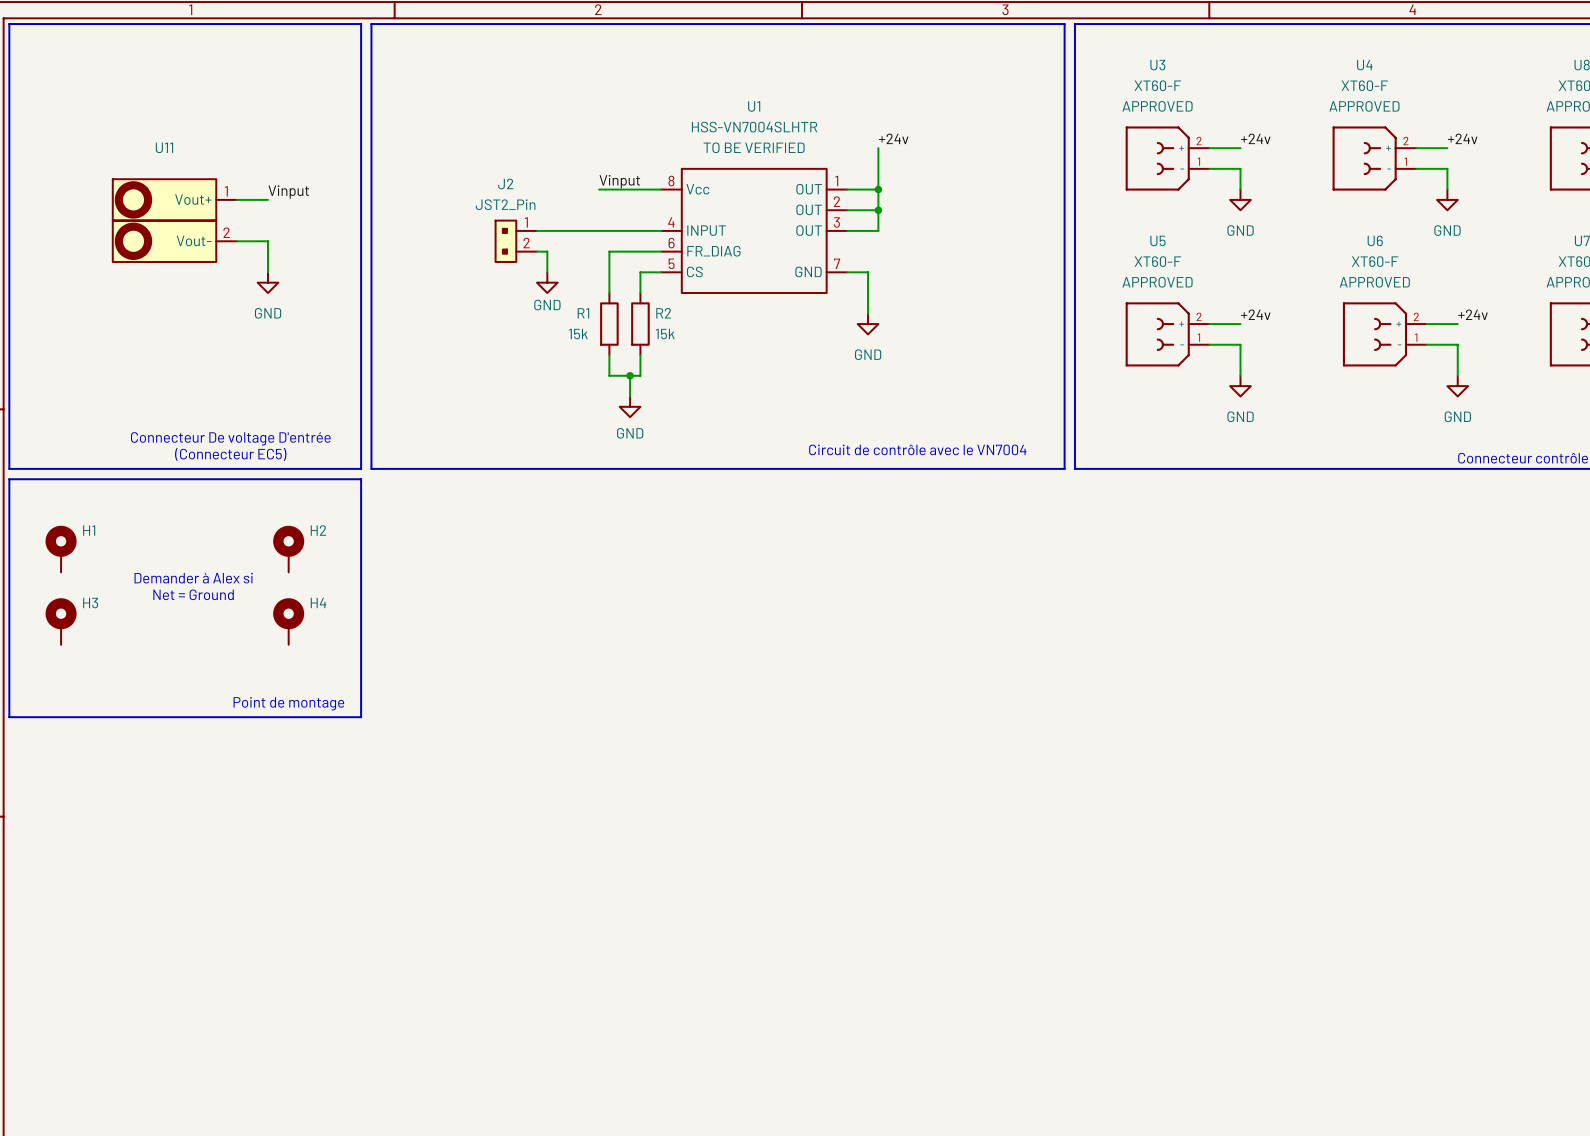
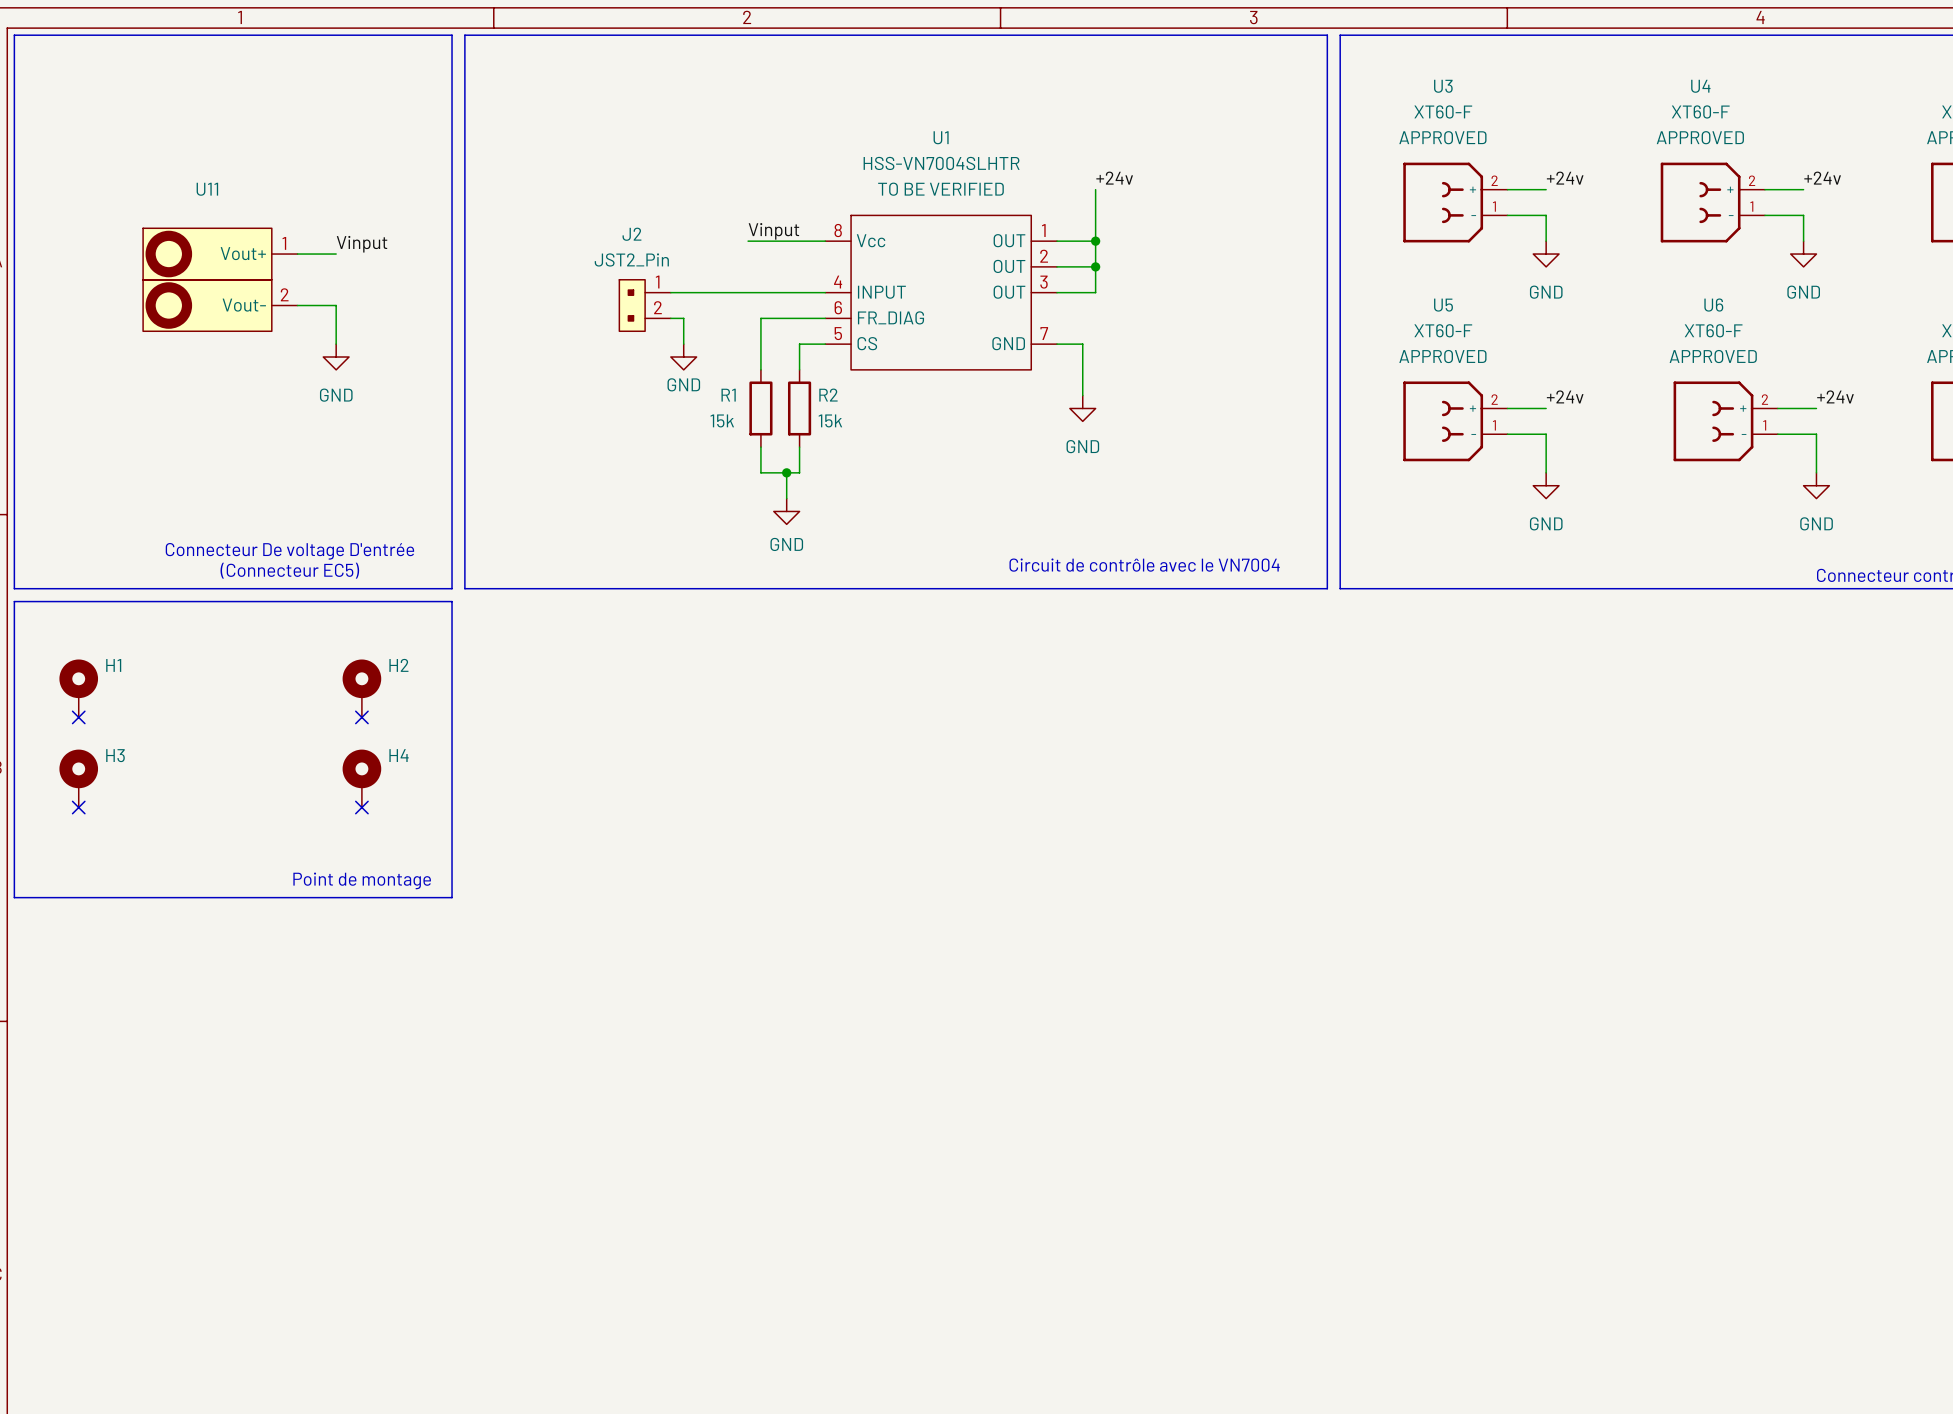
no-connect mark: none -> (78, 717)
no-connect mark: none -> (361, 717)
text: Demander à Alex si (193, 578) -> none
text: Net = Ground (193, 594) -> none
no-connect mark: none -> (78, 807)
no-connect mark: none -> (361, 807)

